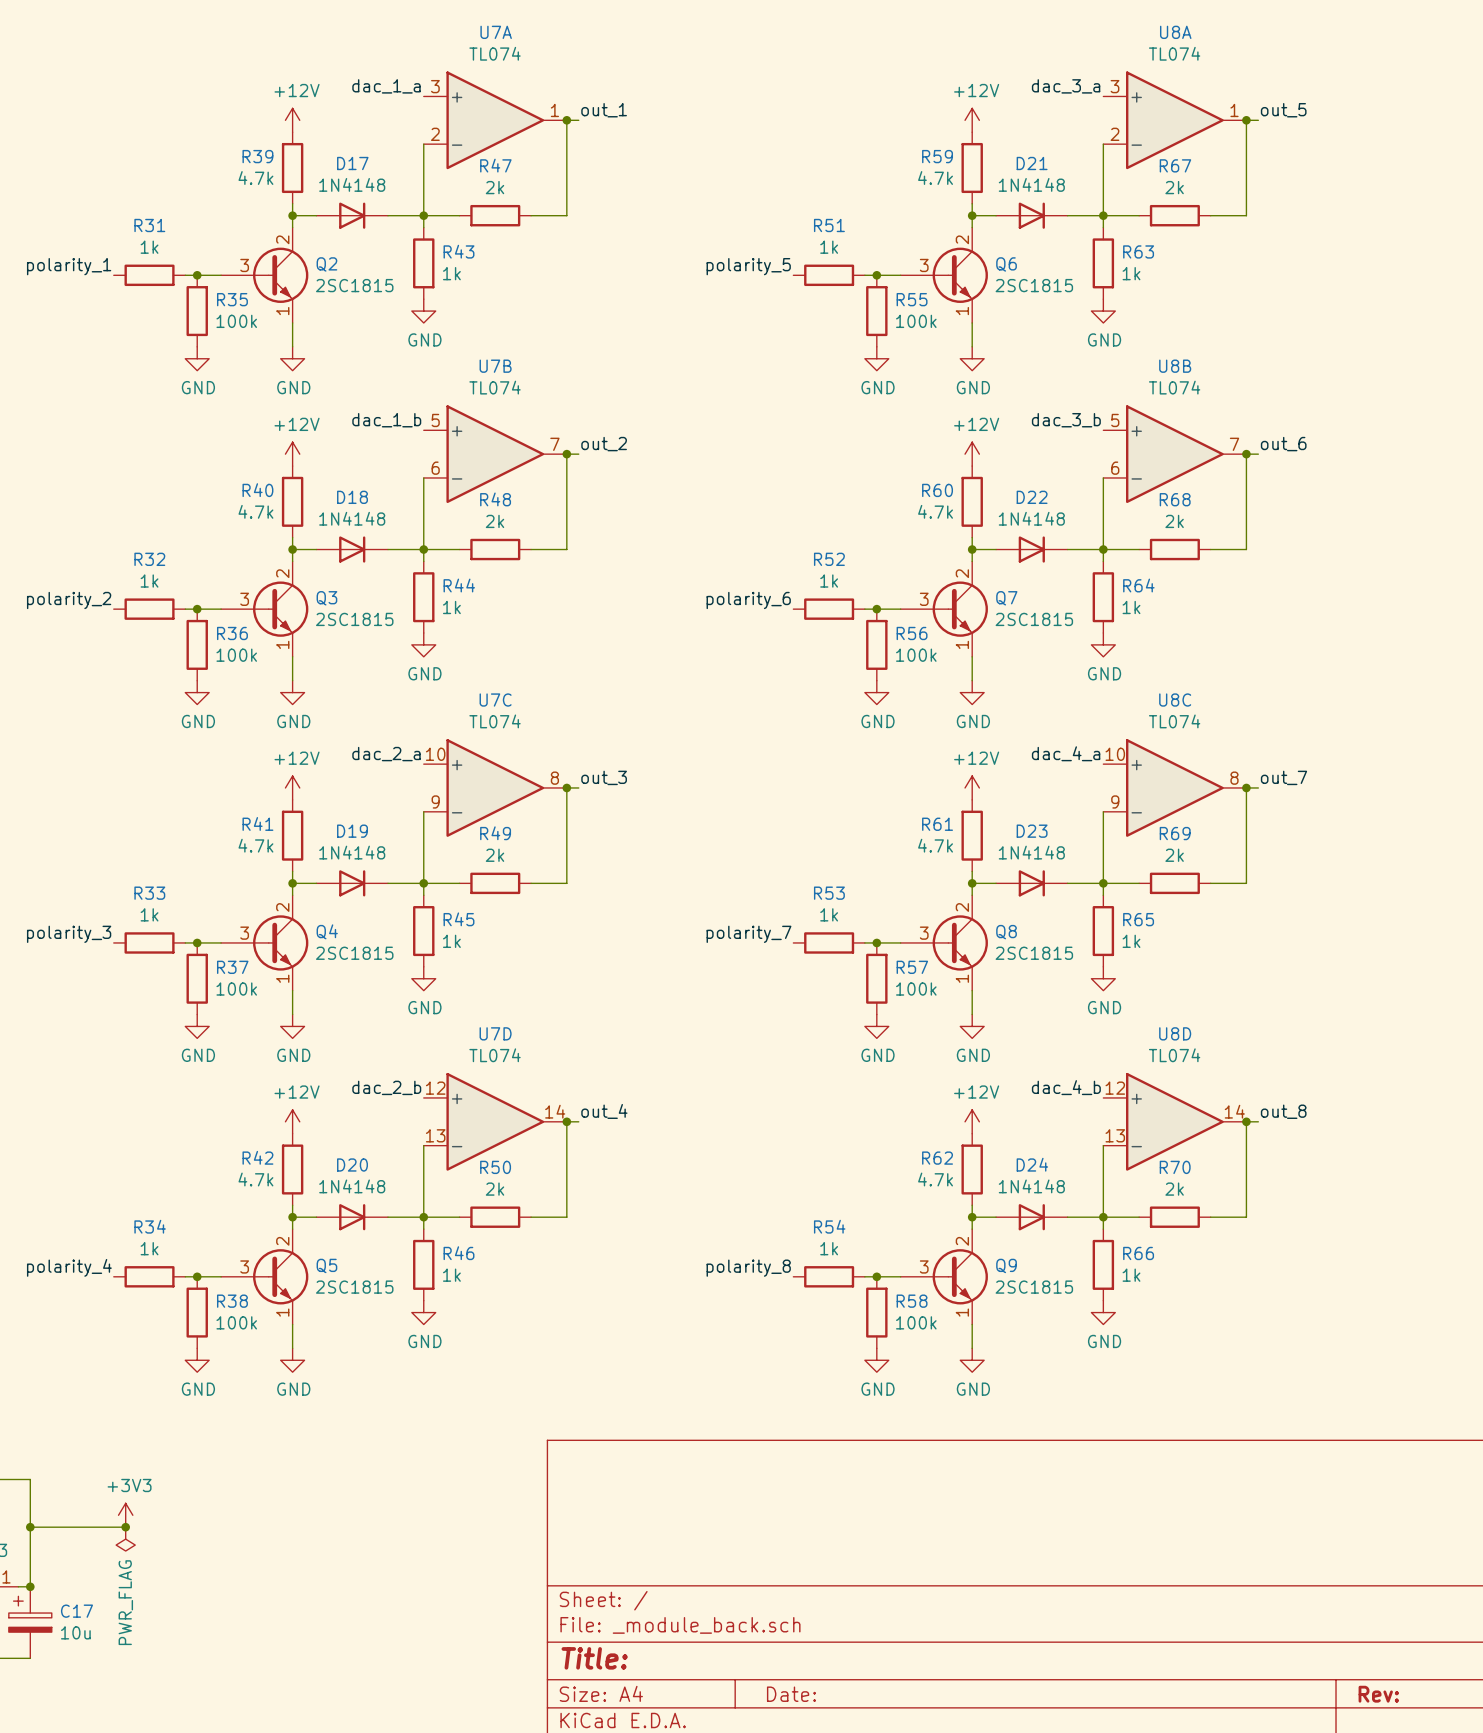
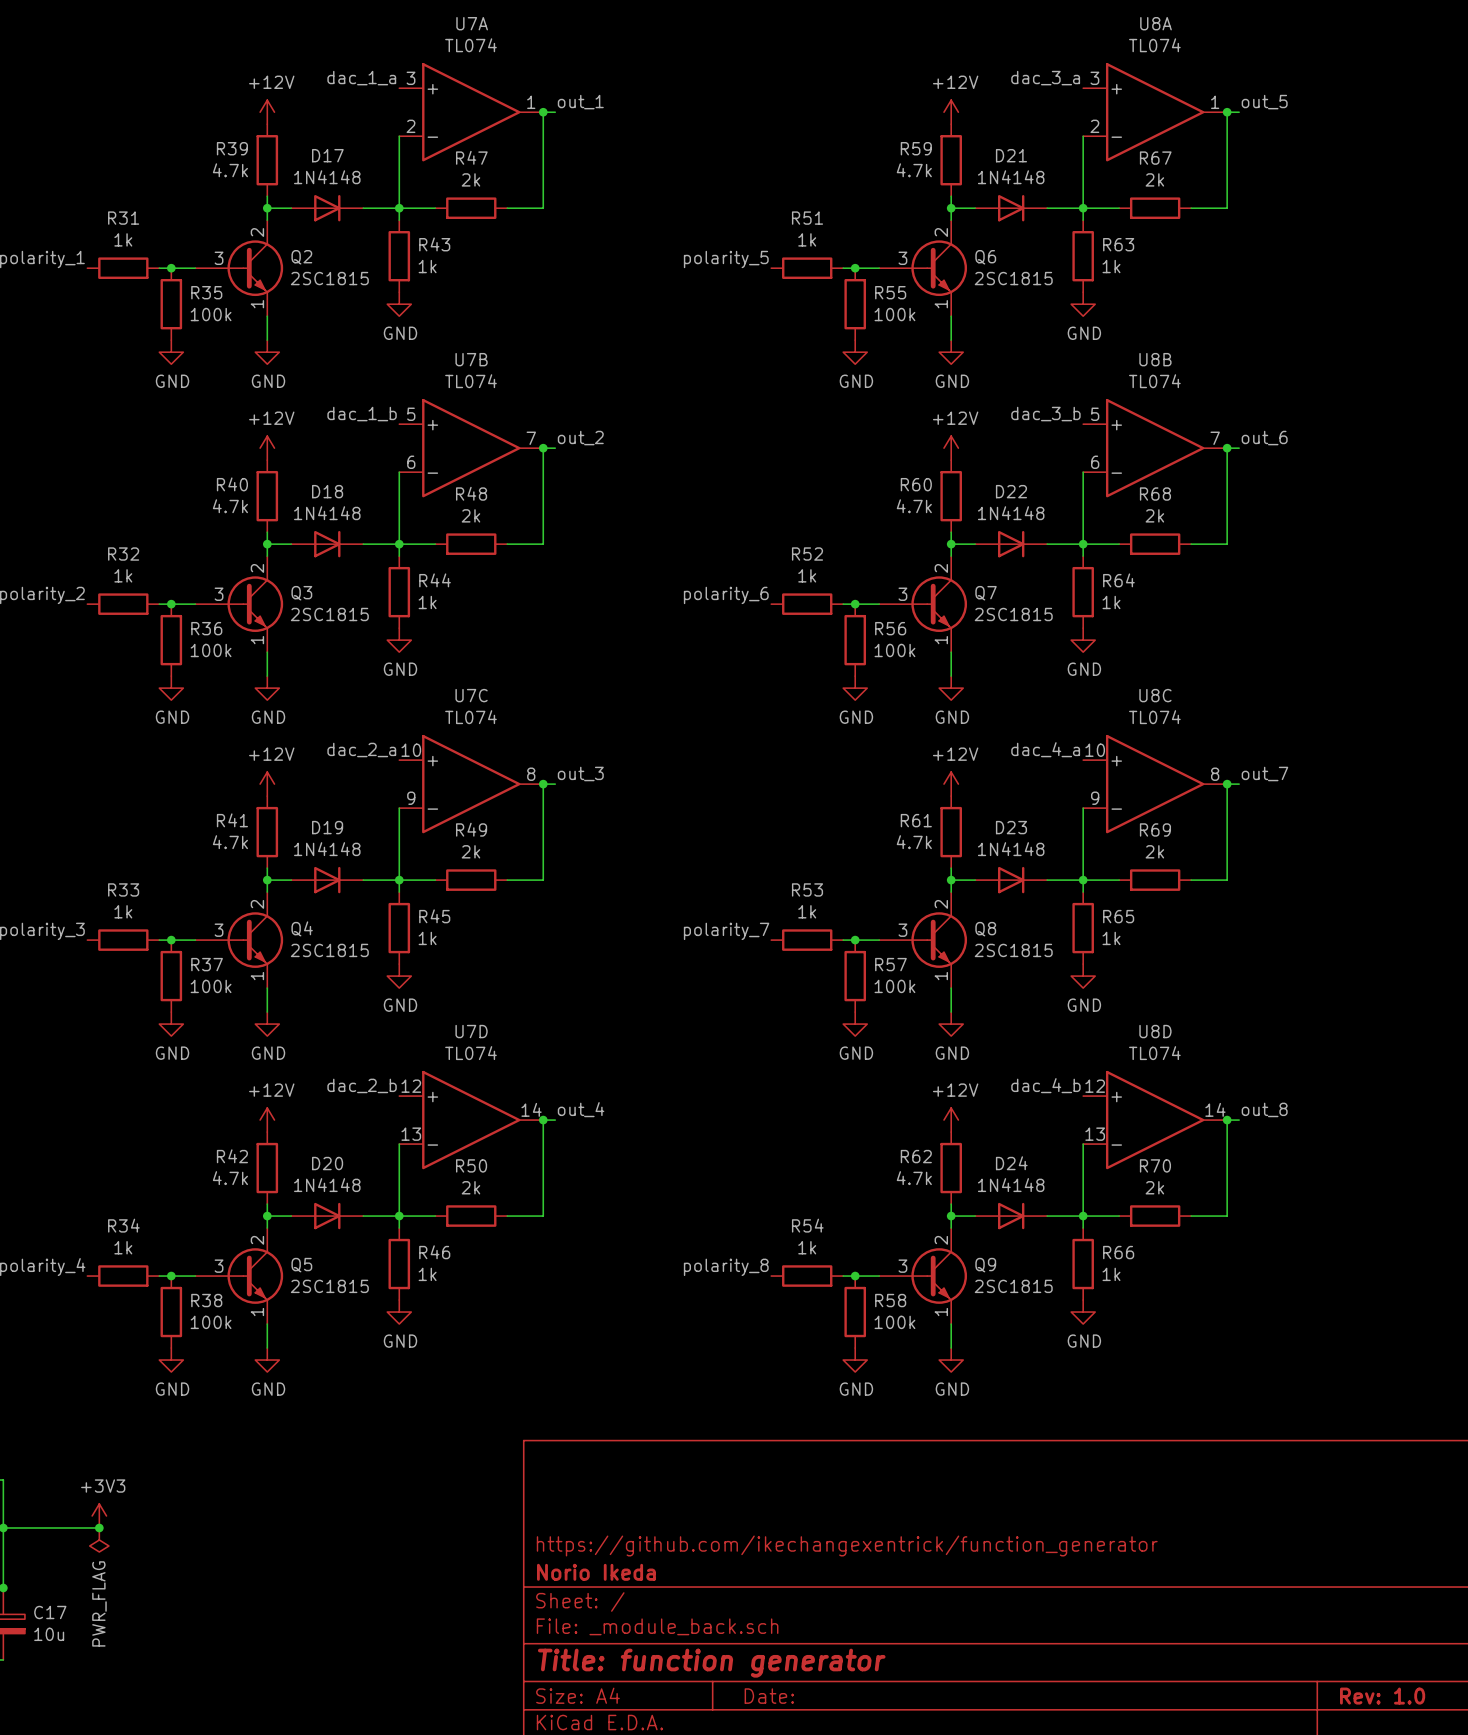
title block: none -> https://github.com/ikechangexentrick/function_generator (847, 1546)
title block: none -> Norio Ikeda (596, 1572)
title block: Title: (594, 1658) -> Title: function generator (711, 1663)
title block: Rev: (1378, 1694) -> Rev: 1.0 (1382, 1696)

